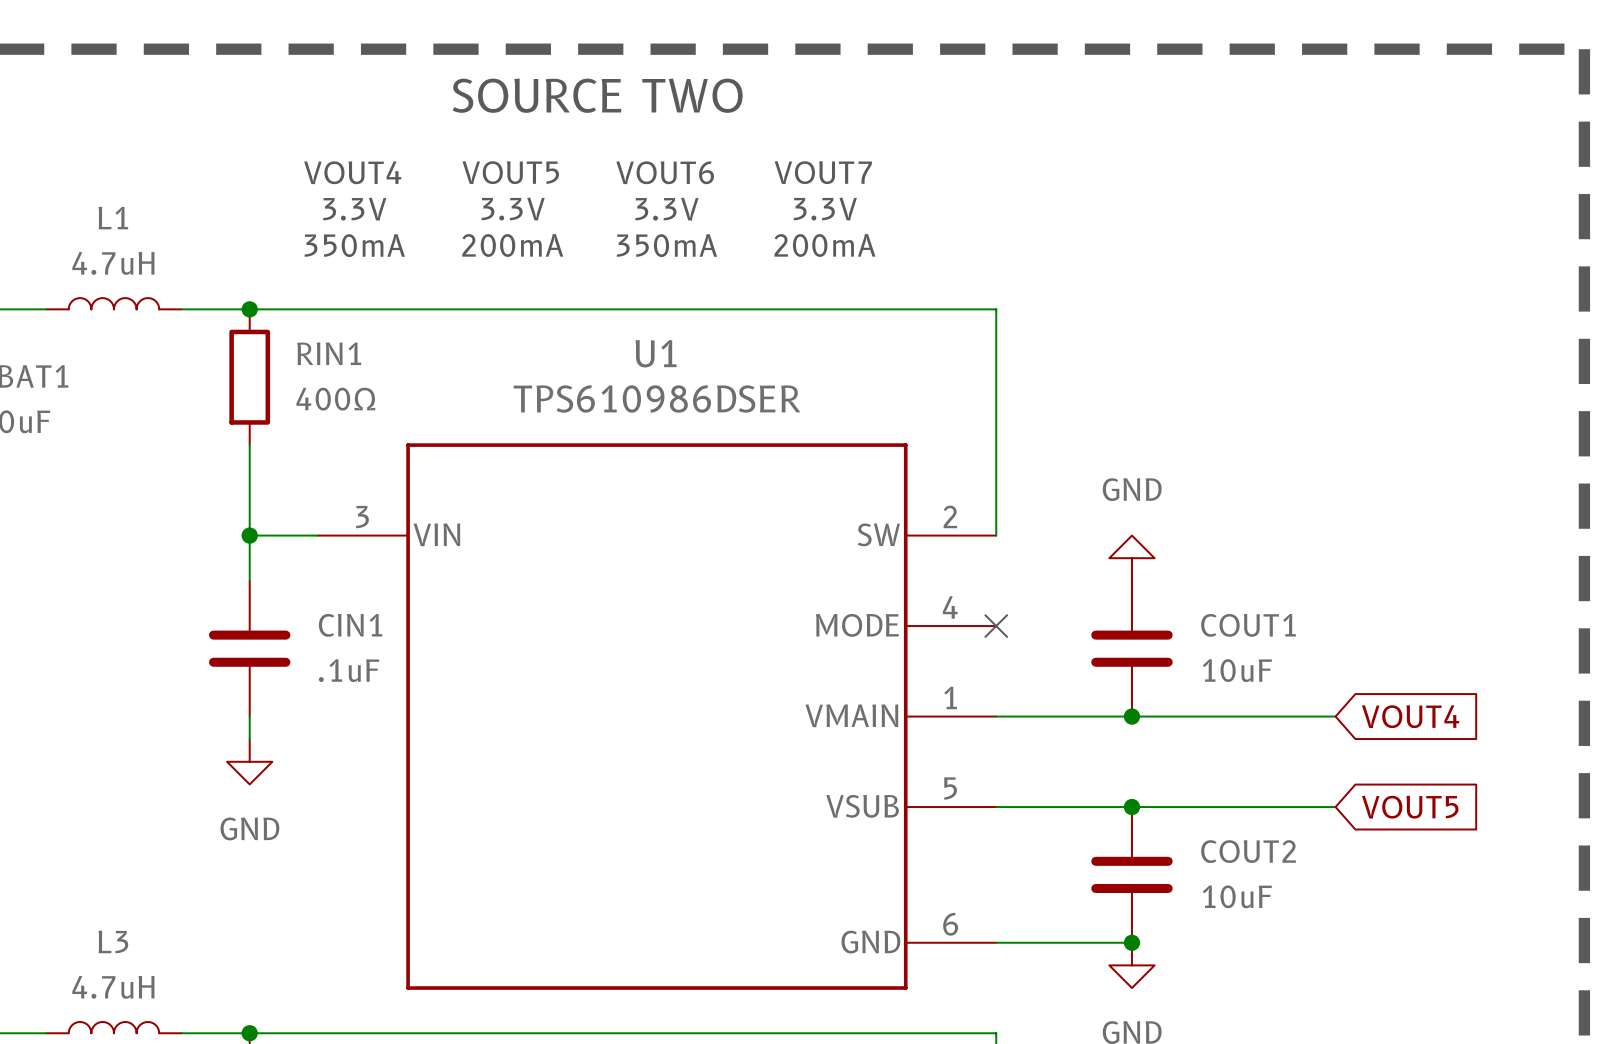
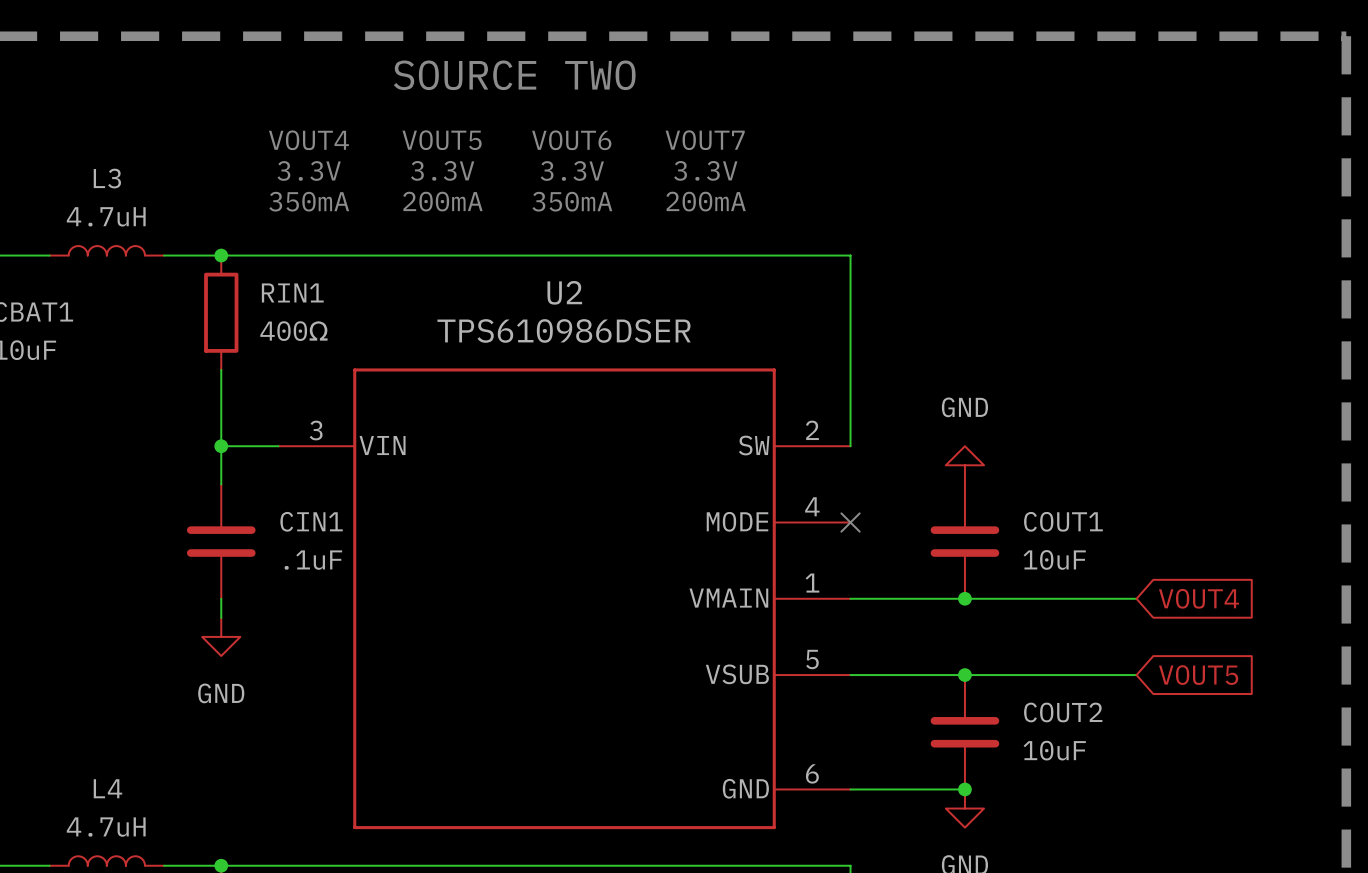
L1 name: L1 (113, 218) -> L3 (107, 178)
U1 name: U1 (656, 353) -> U2 (564, 292)
L3 name: L3 (113, 941) -> L4 (107, 788)

